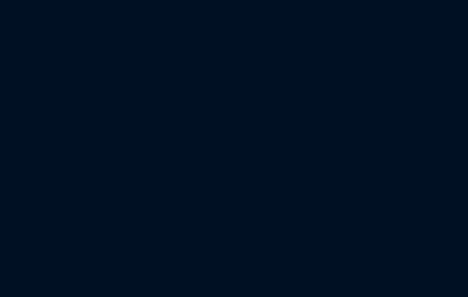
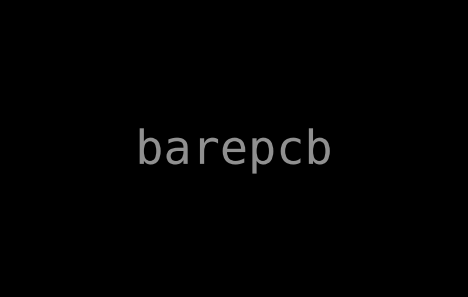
drawing: none -> [139, 128, 330, 174]

